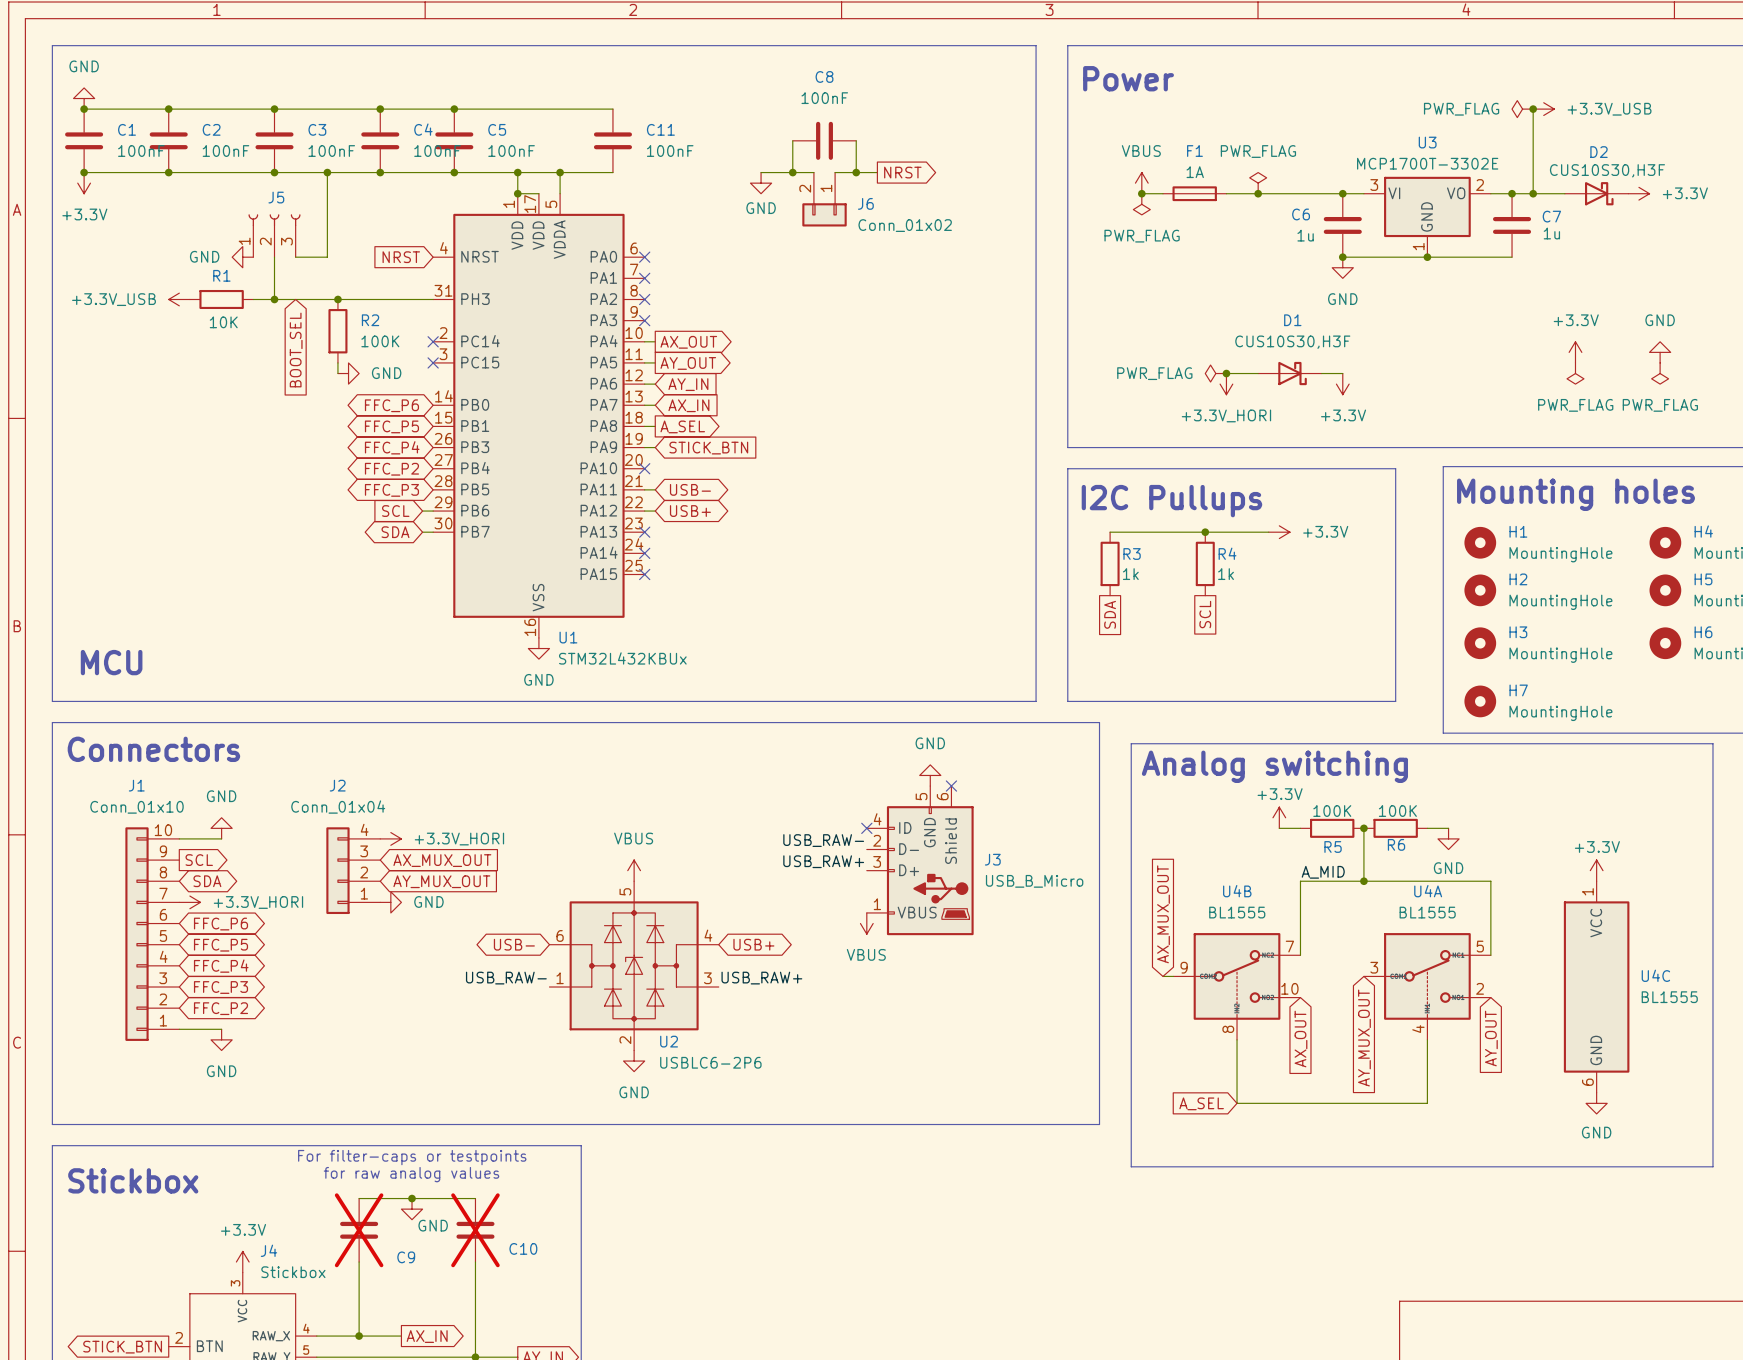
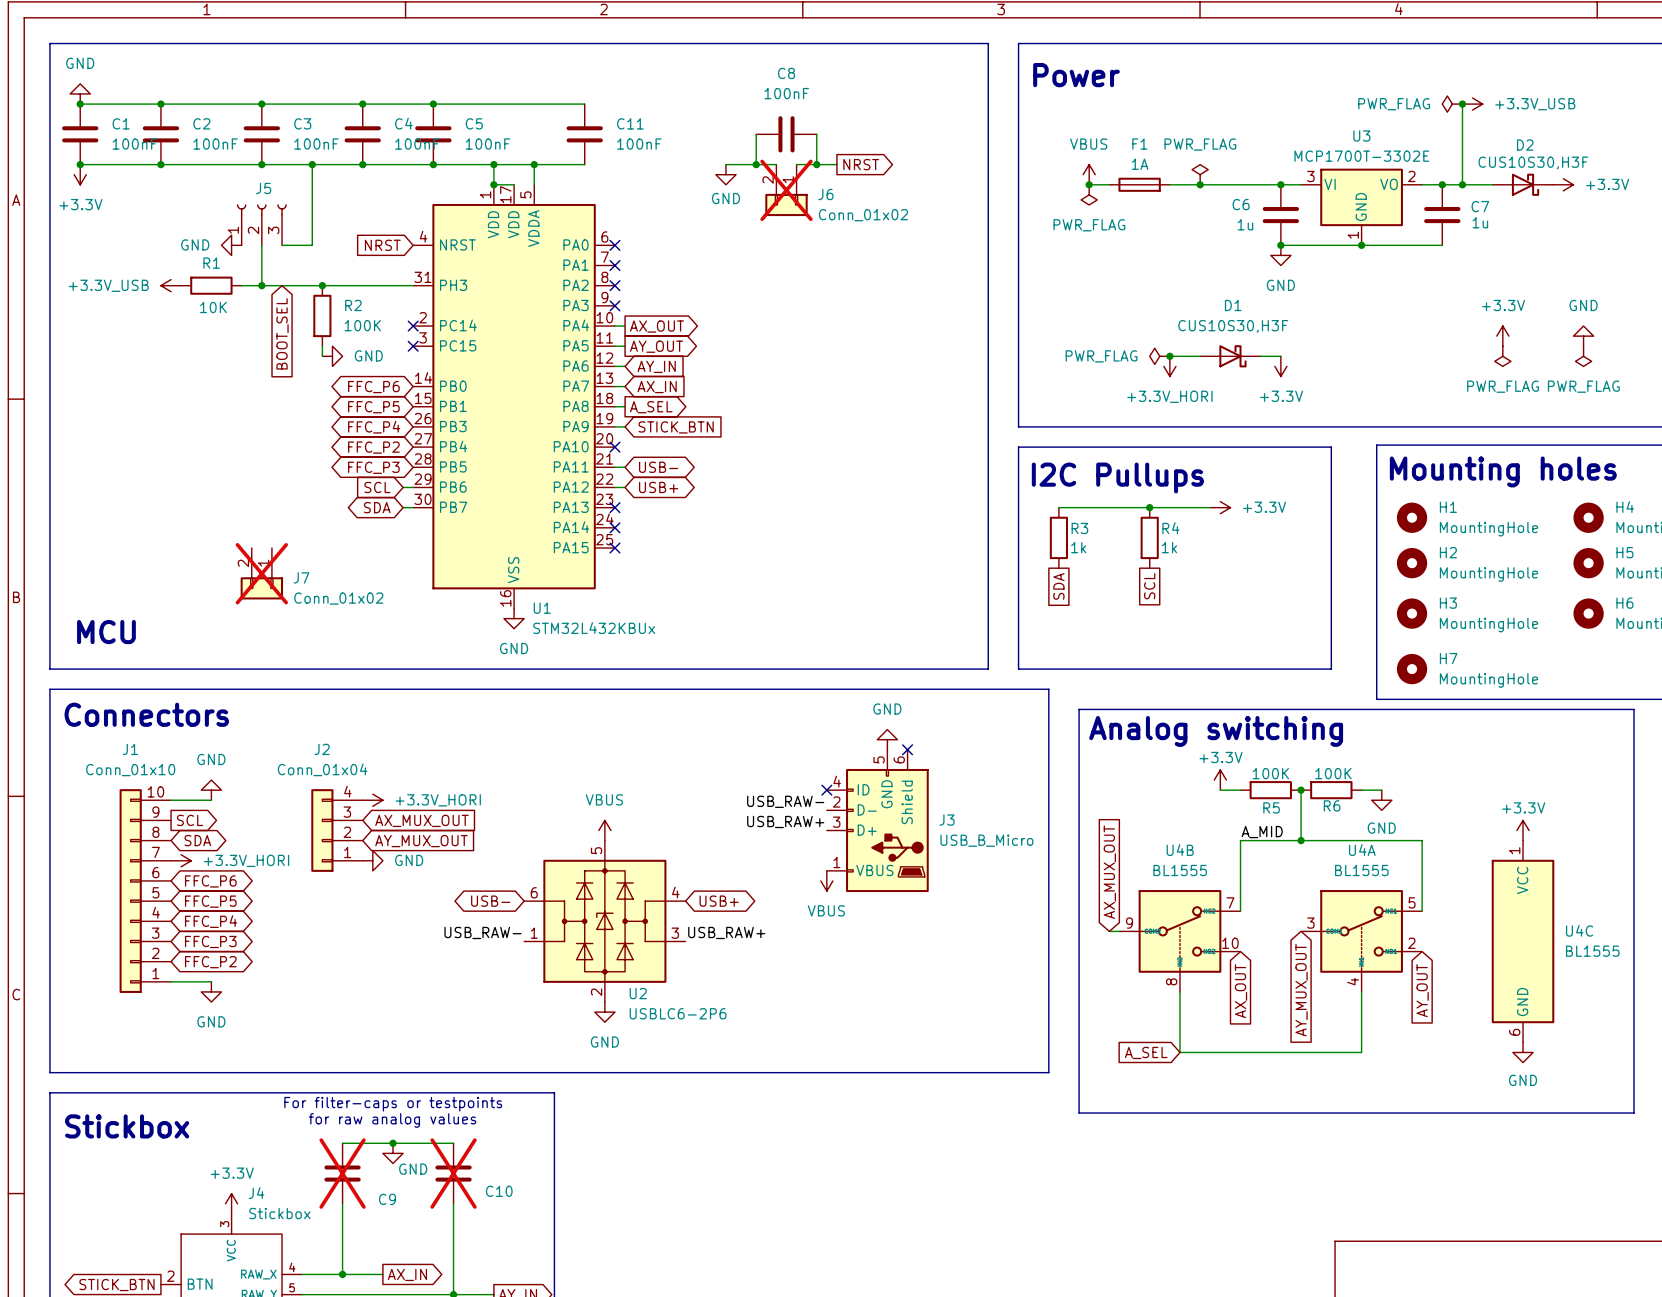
J6 do-not-place cross: none -> (786, 190)
J7: none -> Conn_01x02 (261, 573)

